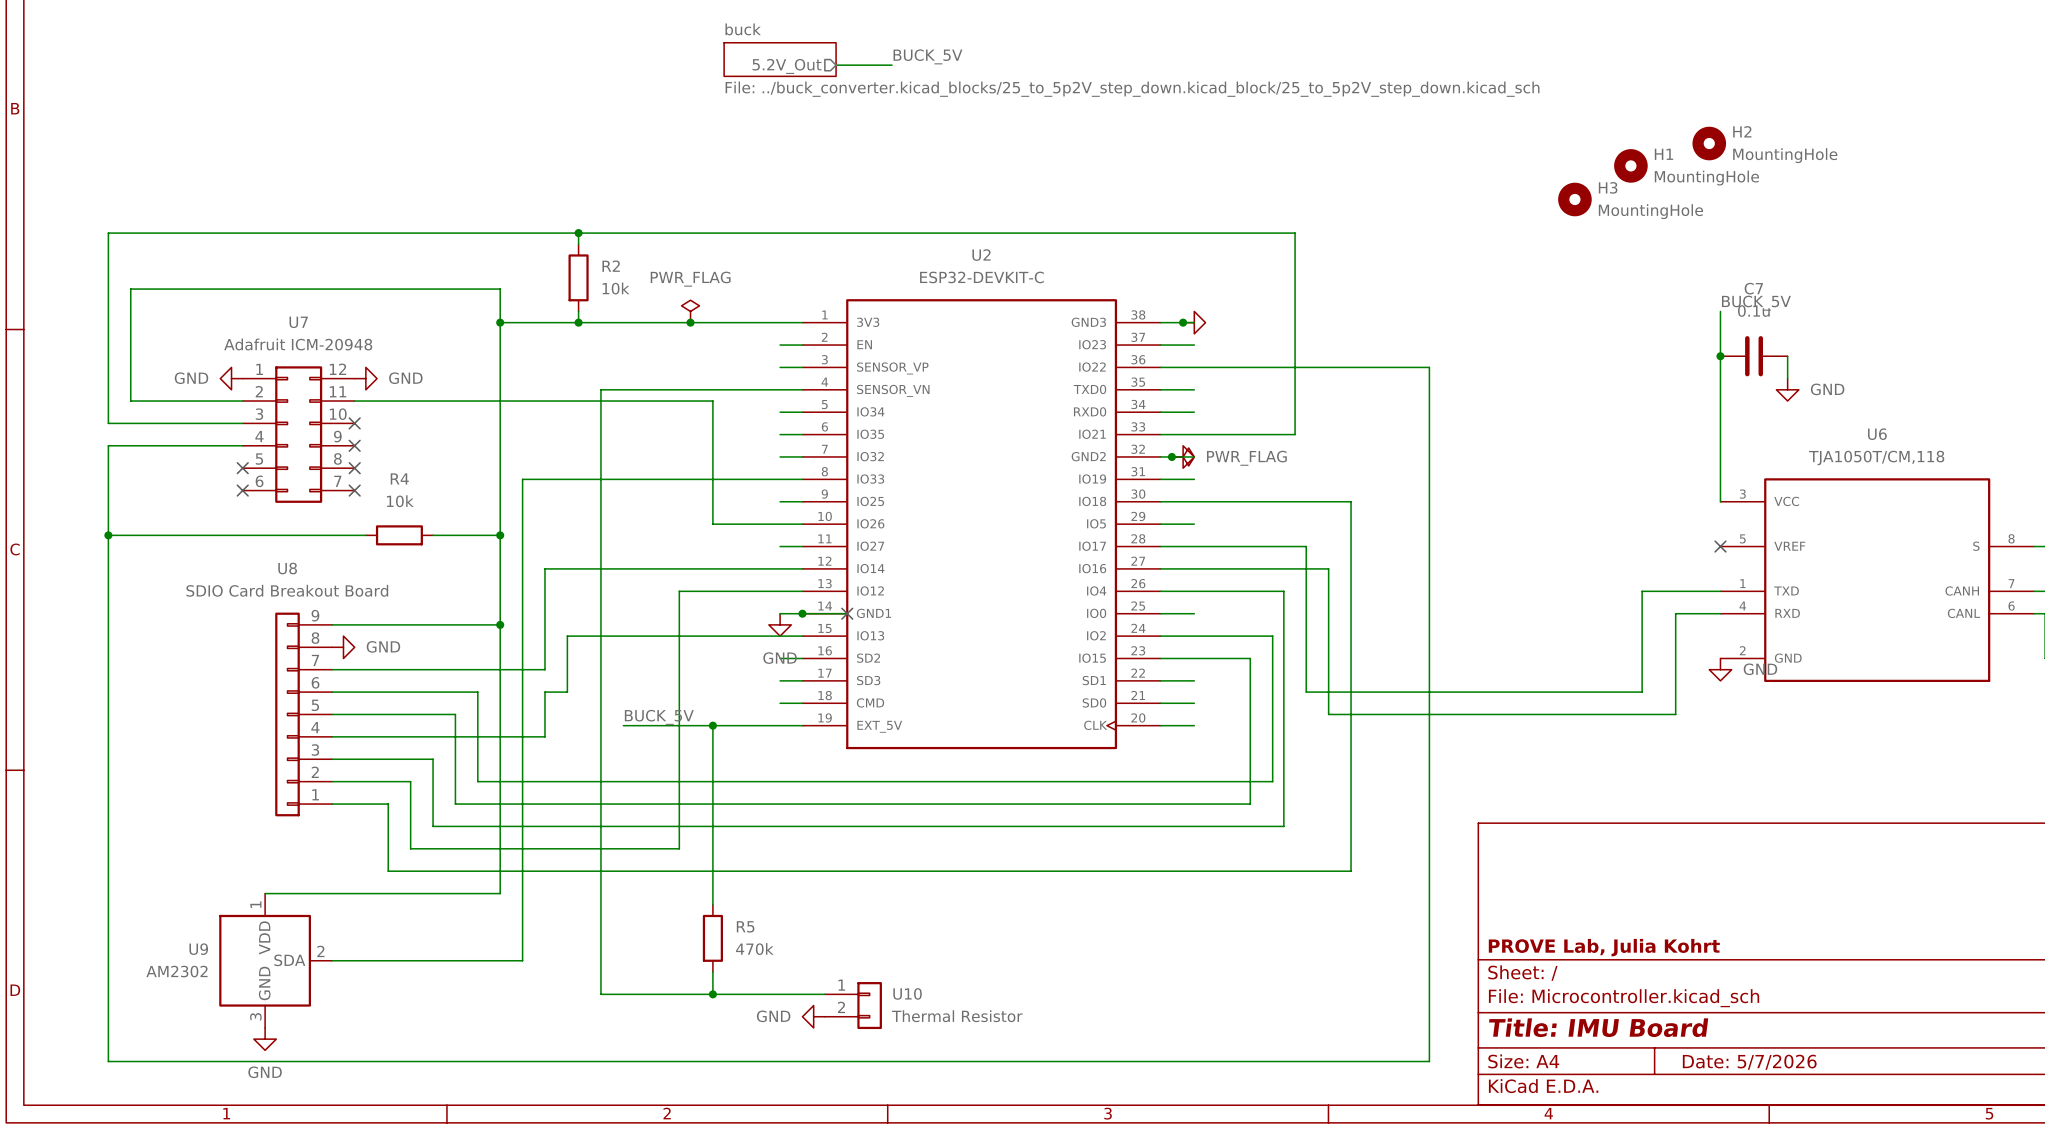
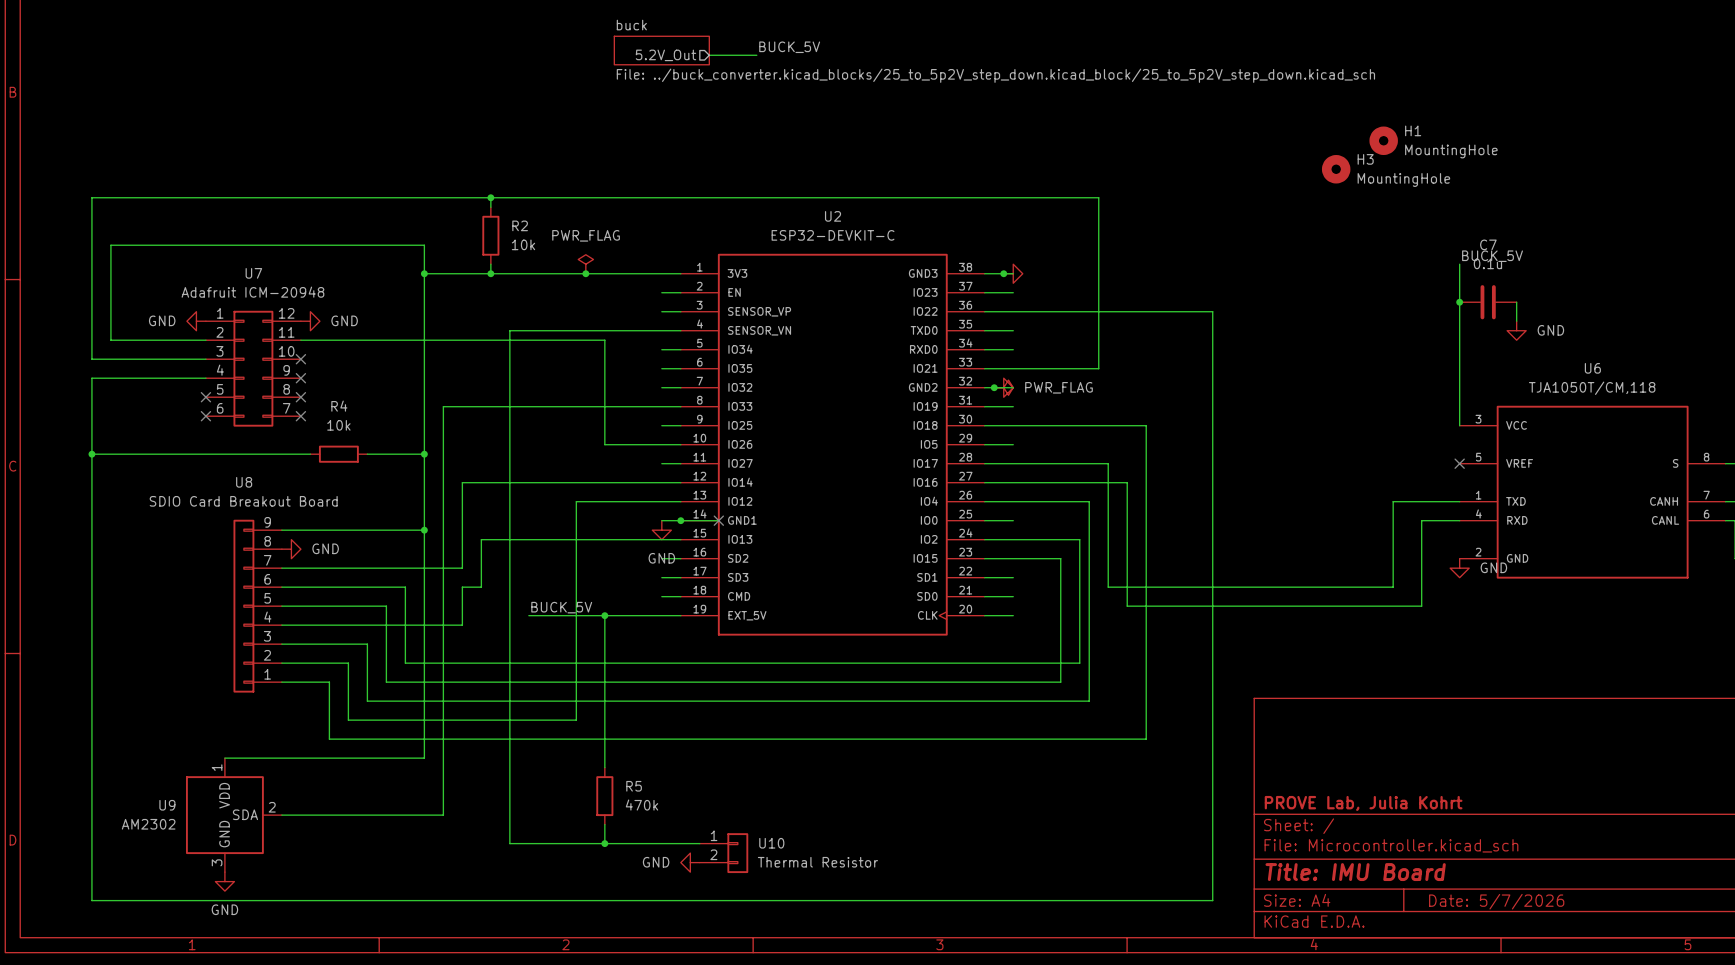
H2: MountingHole (1709, 143) -> none

